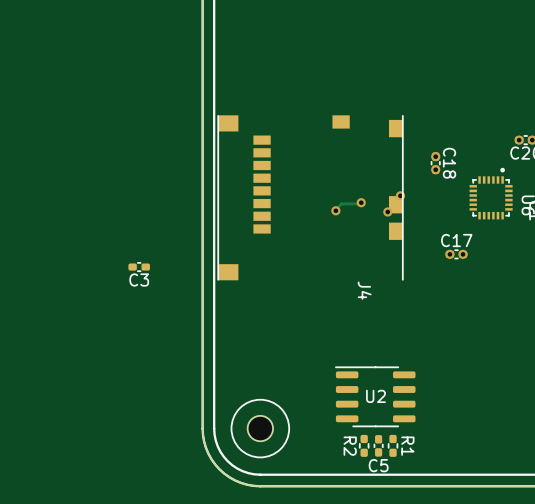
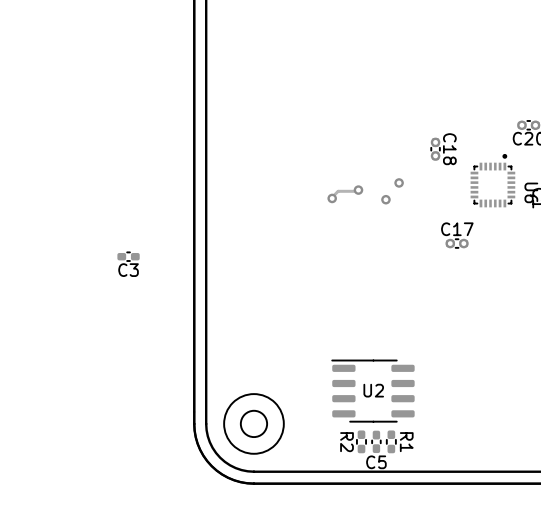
J4: (310, 197) -> none

